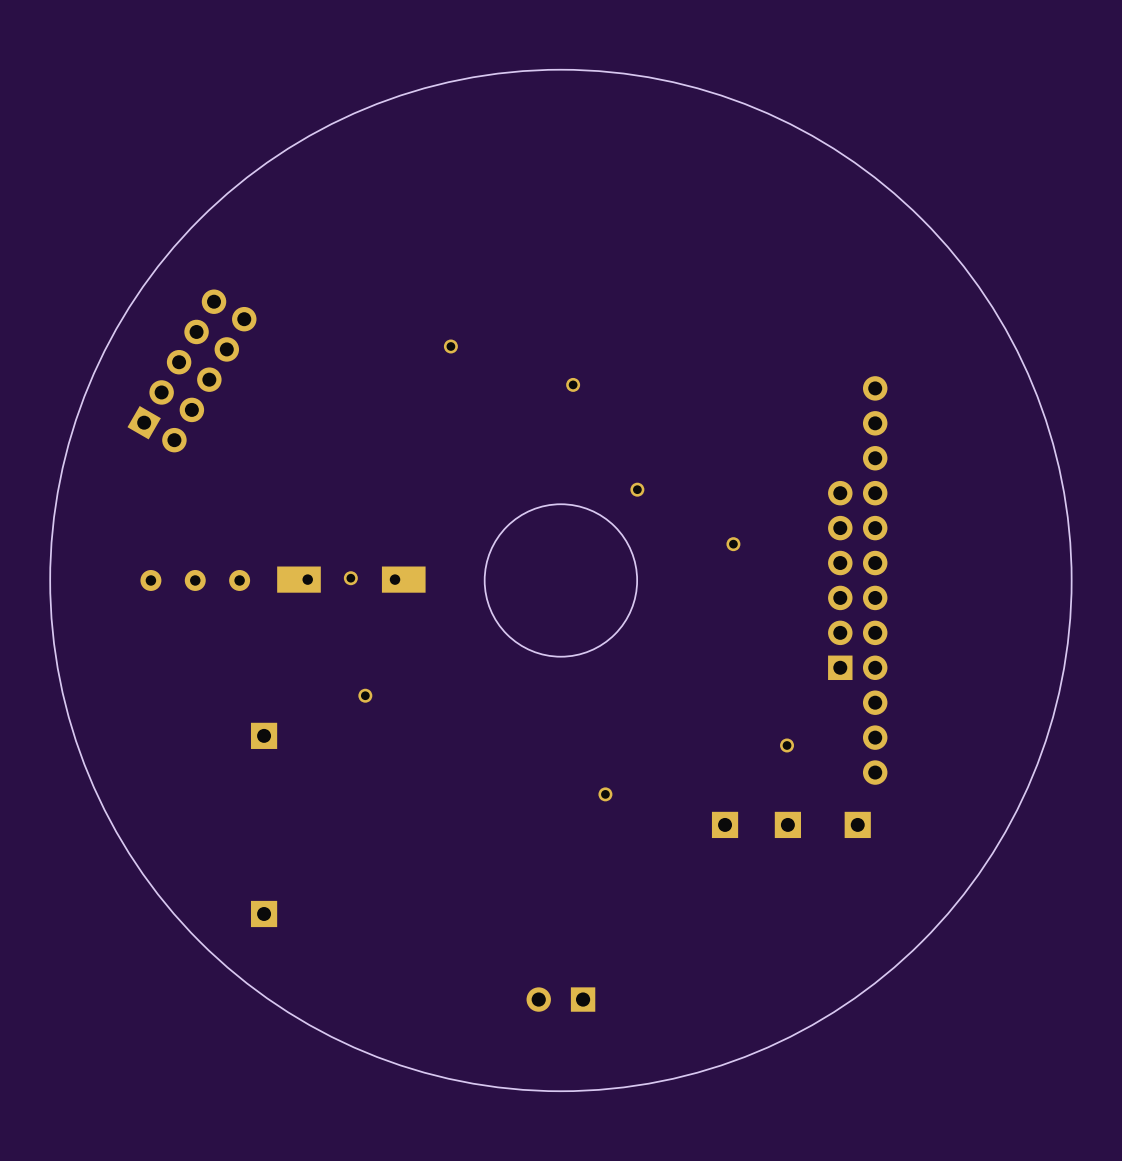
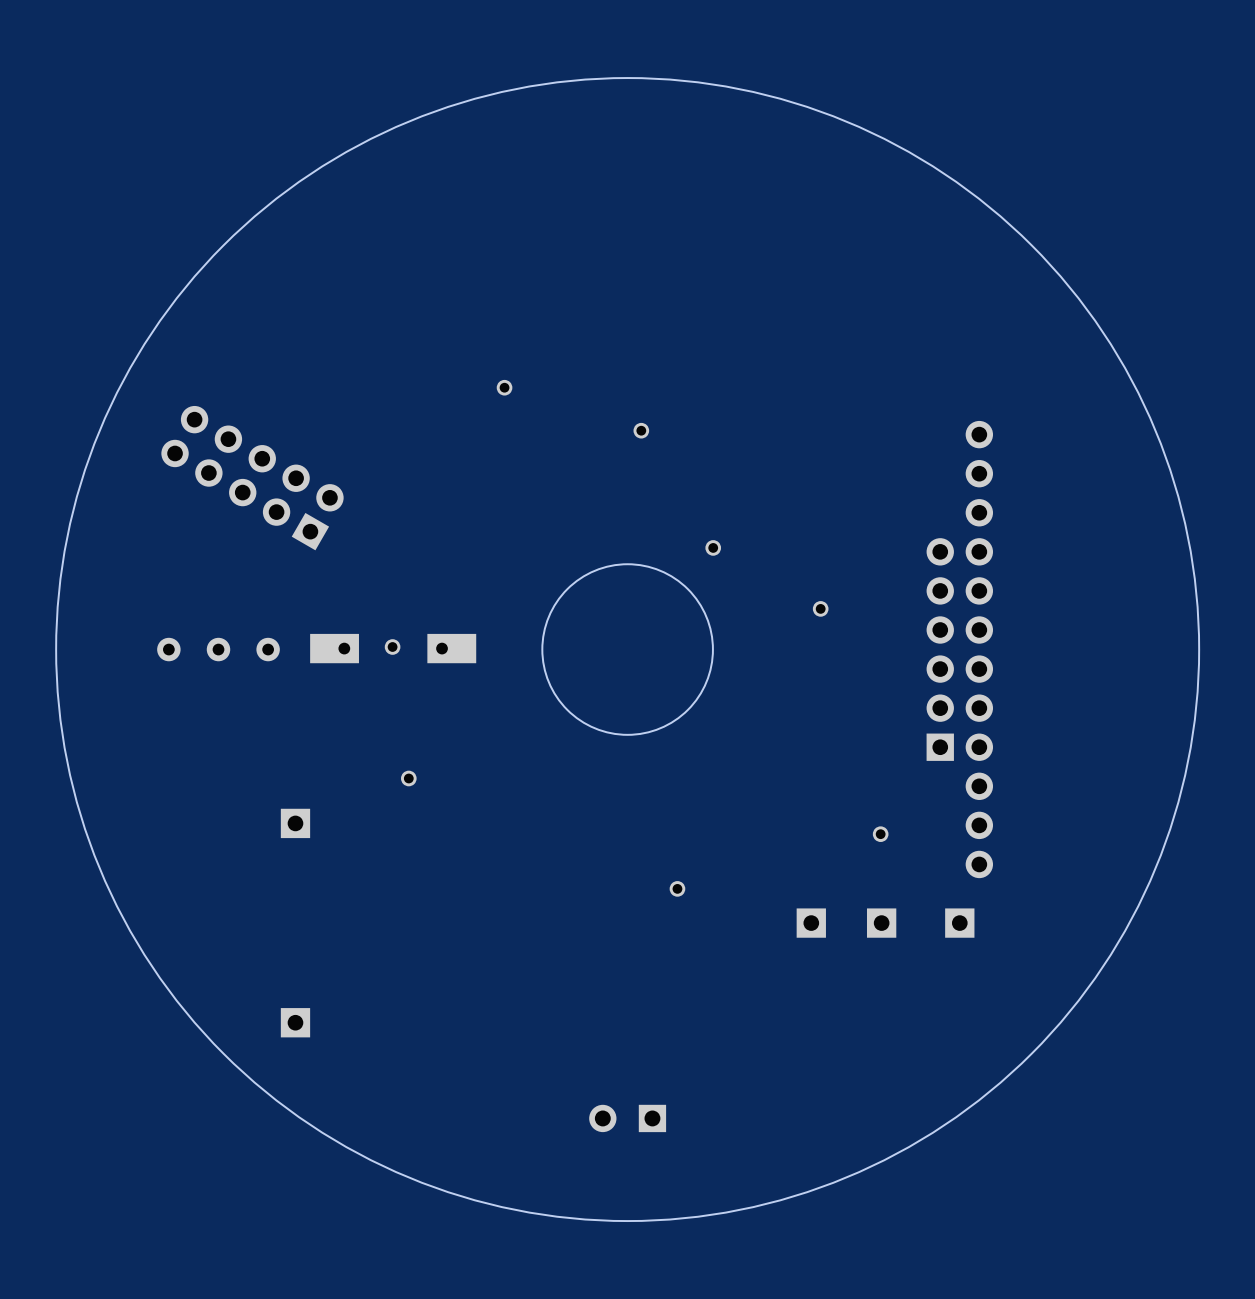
part rotation: 0° (191, 370) -> 90° counterclockwise (252, 478)

